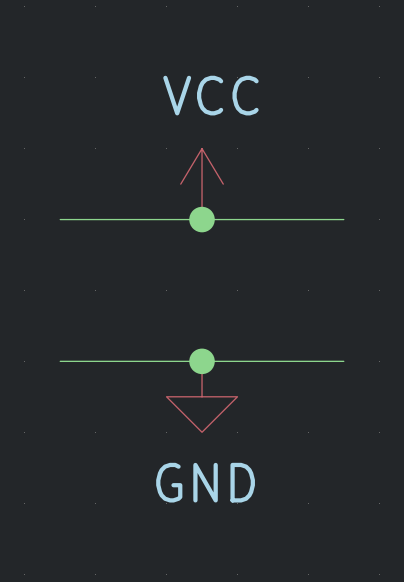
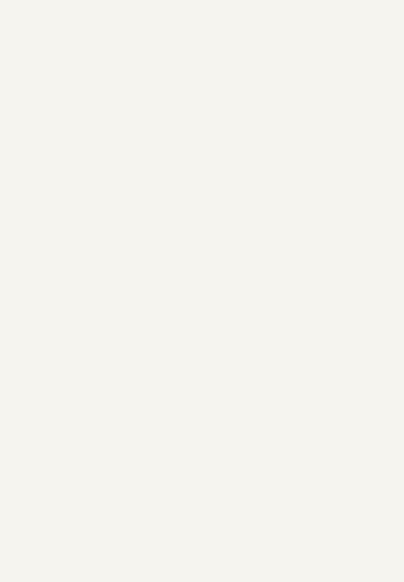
power symbol: VCC (202, 184) -> none
wire: (60, 219) (343, 219) -> none
junction: (202, 219) -> none
wire: (60, 361) (343, 361) -> none
junction: (202, 361) -> none
power symbol: GND (202, 396) -> none

